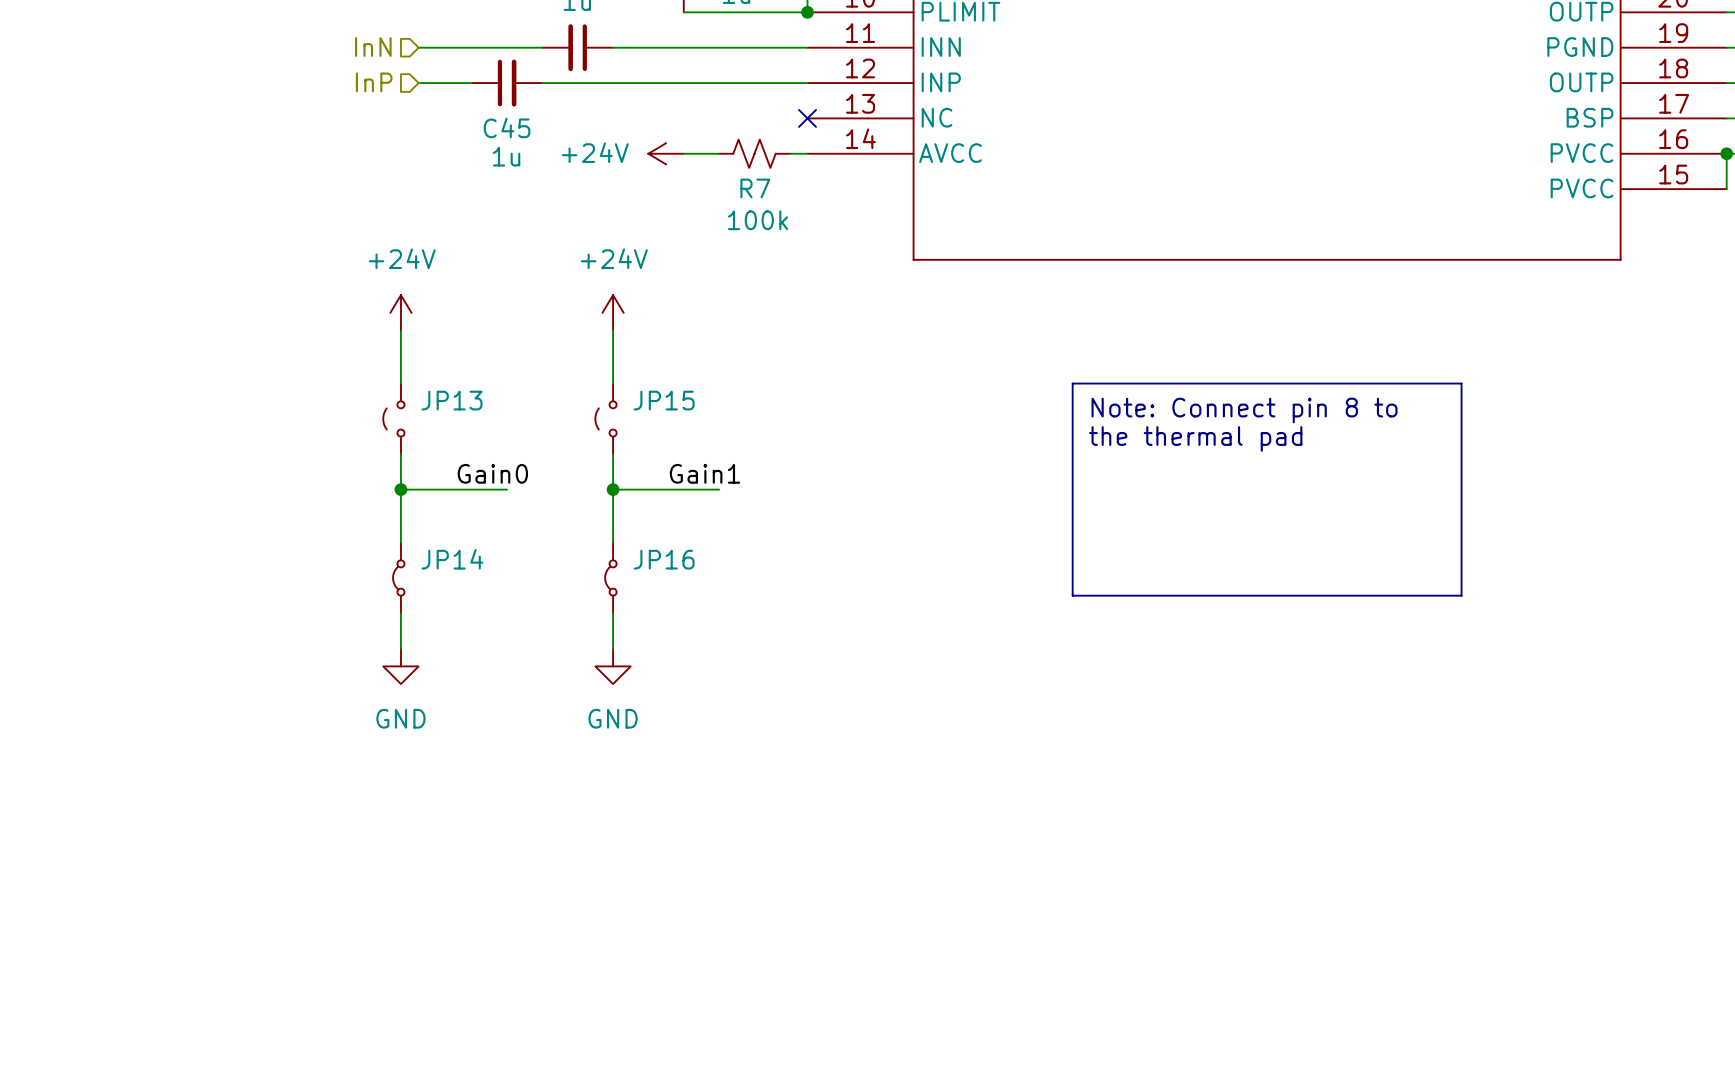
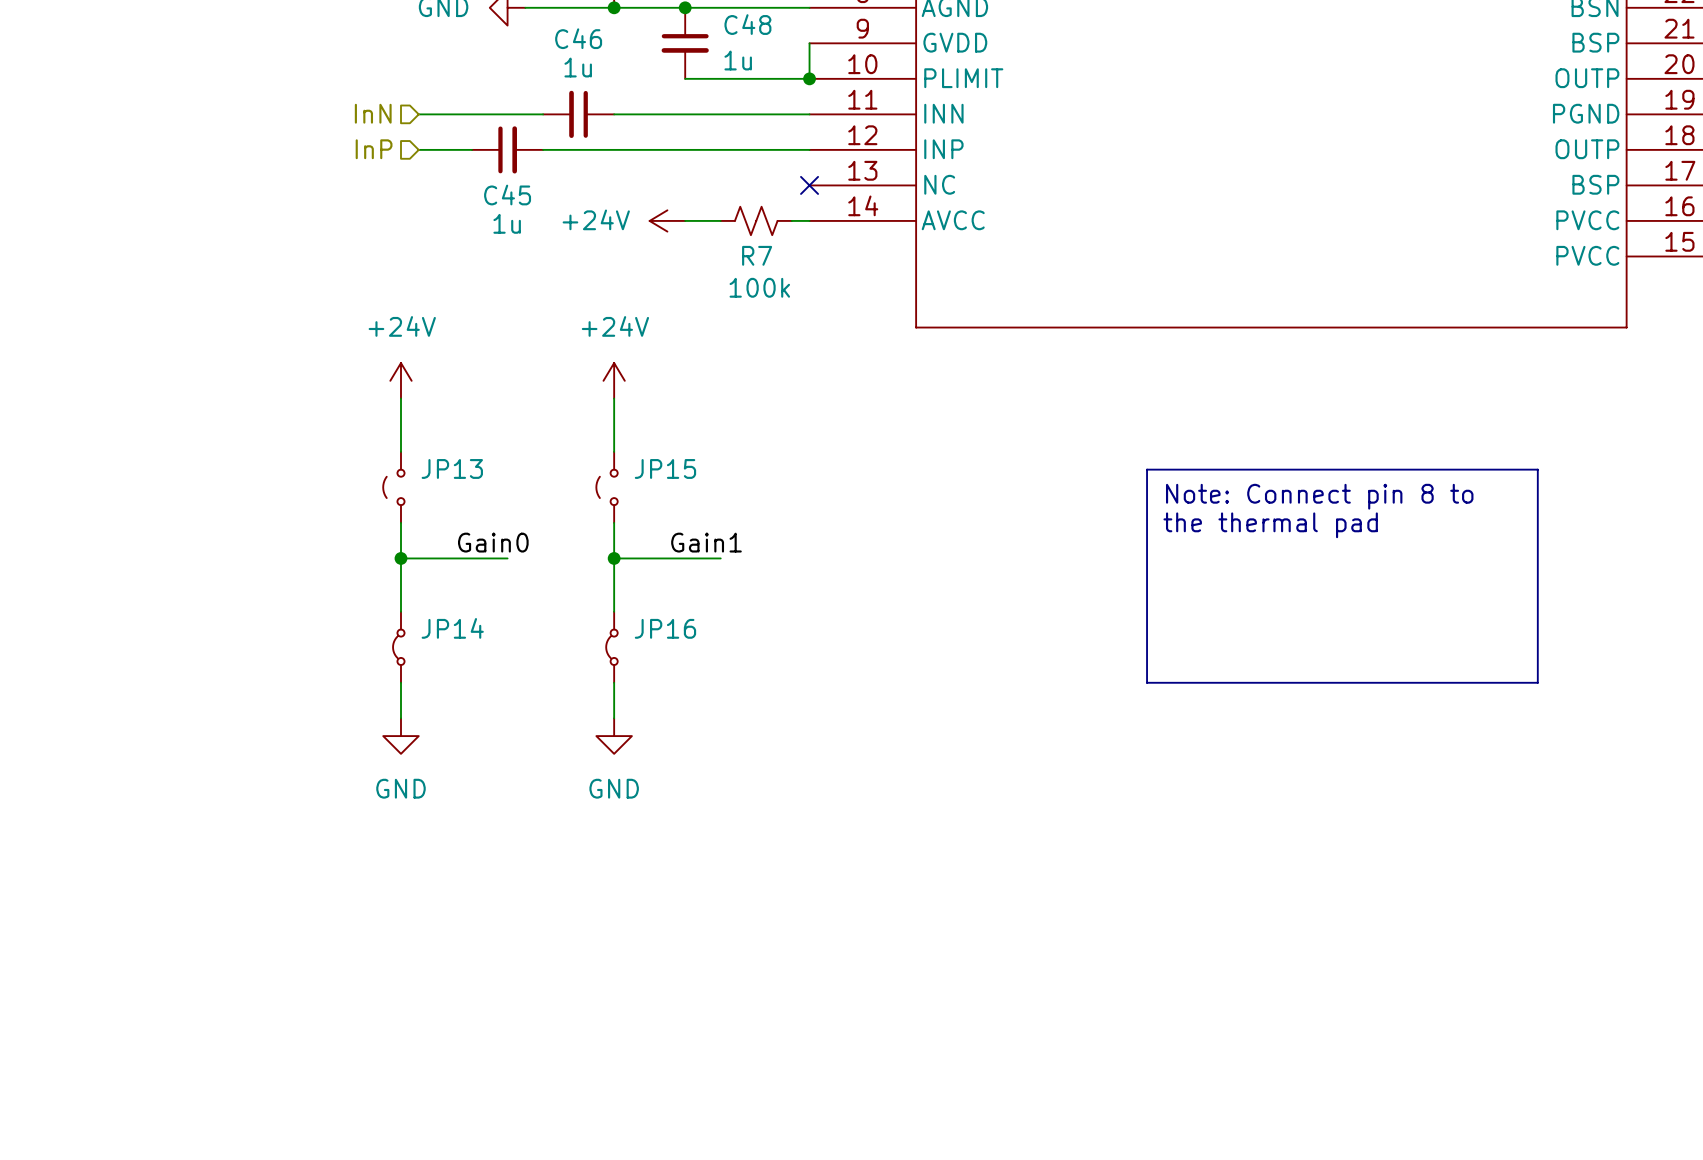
line: (1072, 383) (1461, 383) (1461, 595) (1072, 595) (1072, 383) -> (1147, 469) (1147, 682) (1537, 682) (1537, 469) (1147, 469)
text position: Note: Connect pin 8 to (1244, 410) -> Note: Connect pin 8 to (1319, 496)
text position: the thermal pad (1195, 438) -> the thermal pad (1270, 525)

